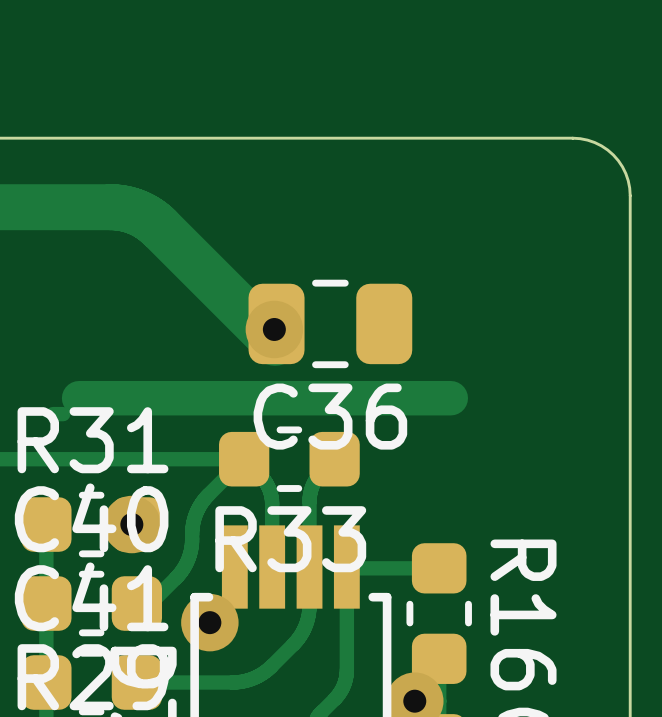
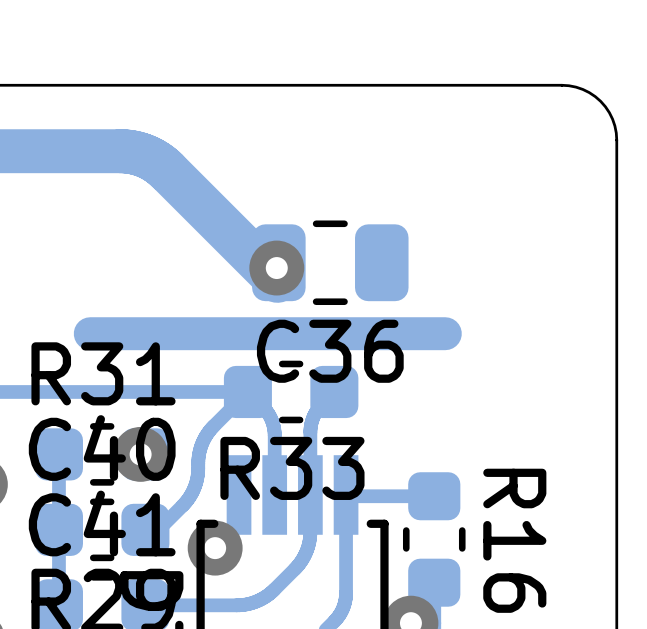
track: (63, 414) (53, 414) -> none

